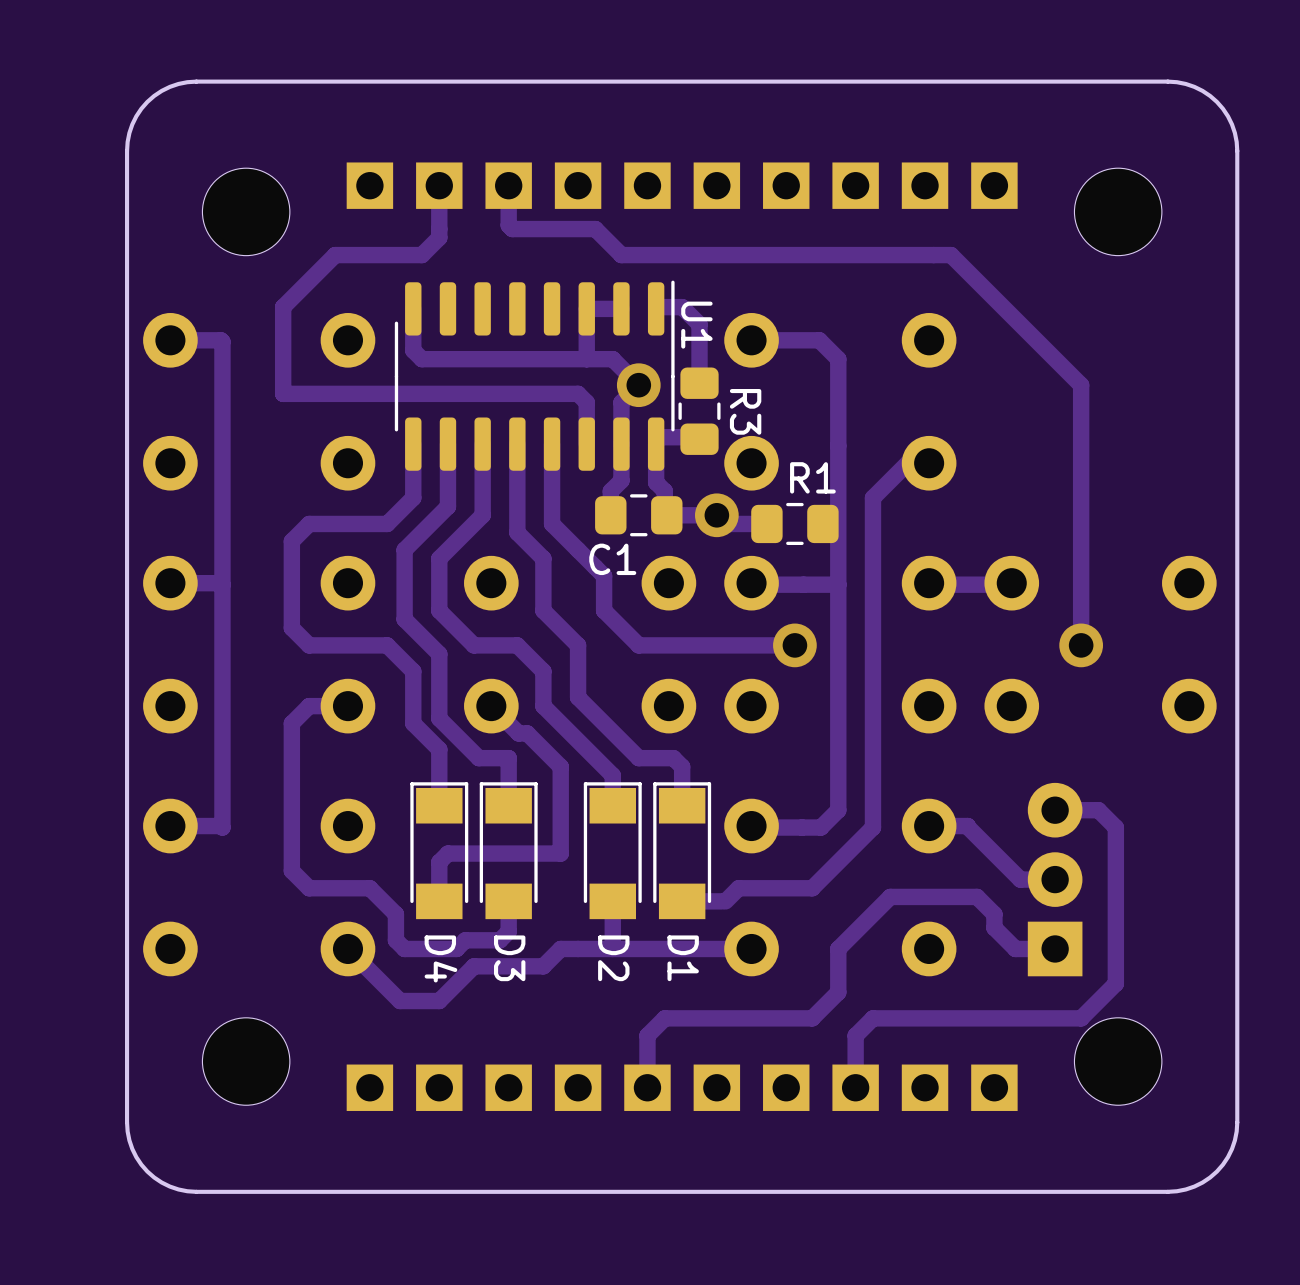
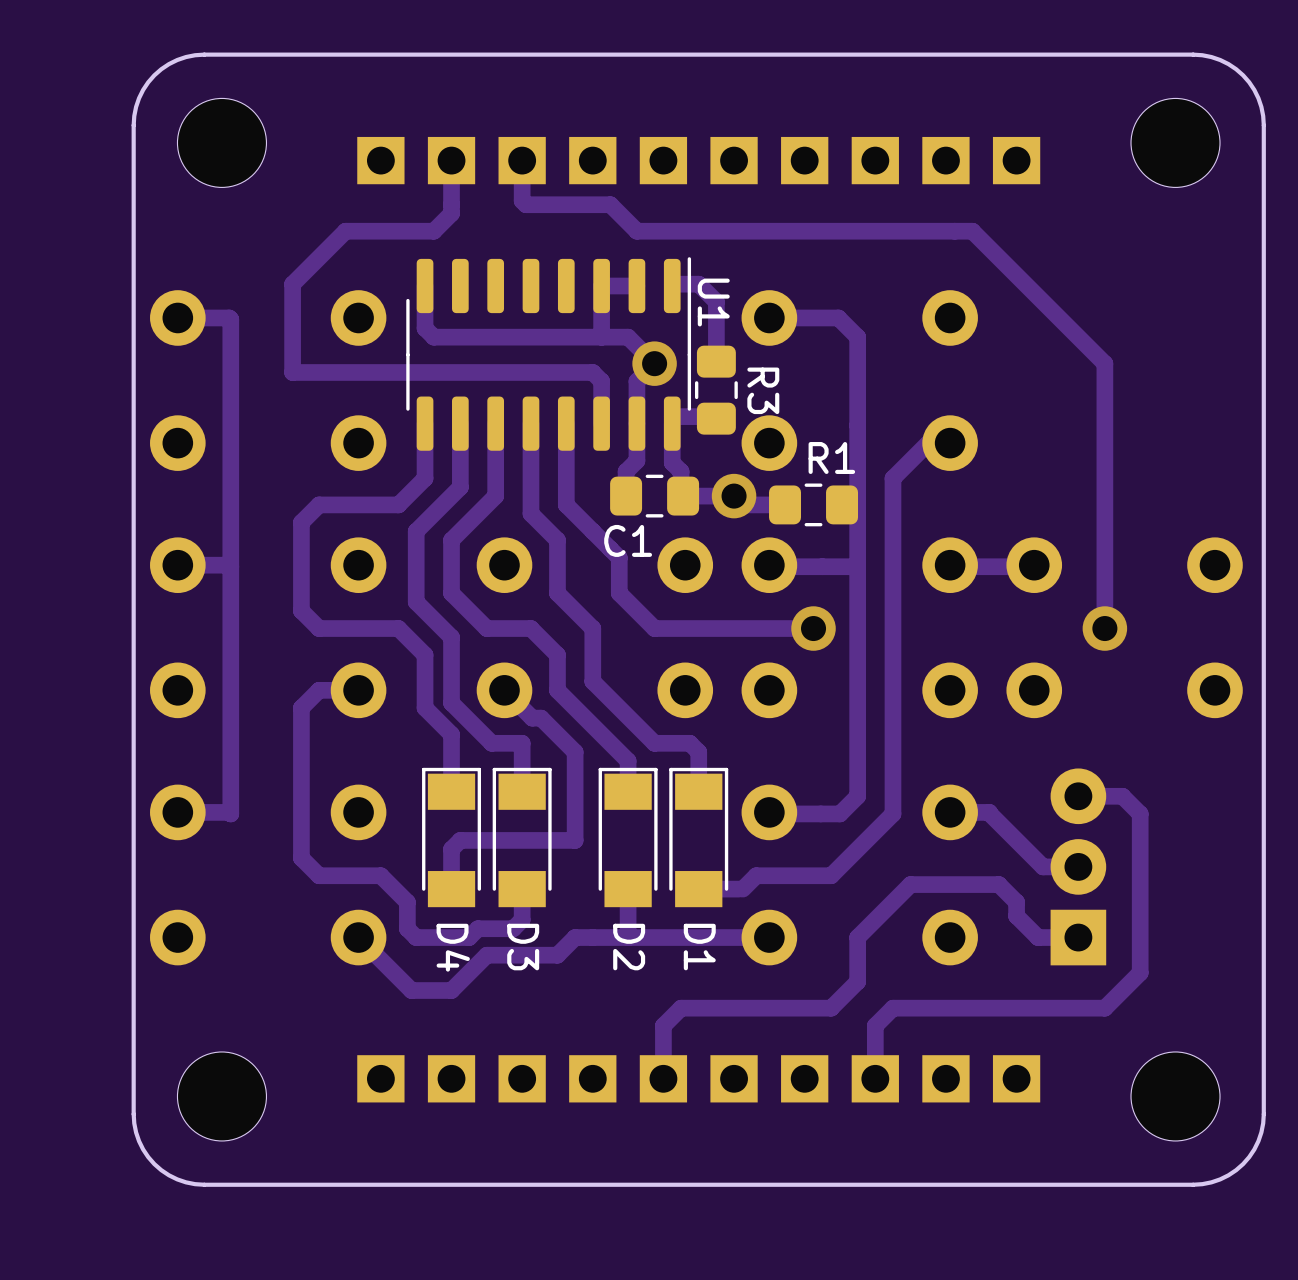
part position: (246, 211) -> (221, 142)
part position: (1118, 211) -> (1175, 142)
part position: (246, 1061) -> (221, 1096)
part position: (1118, 1061) -> (1175, 1096)

